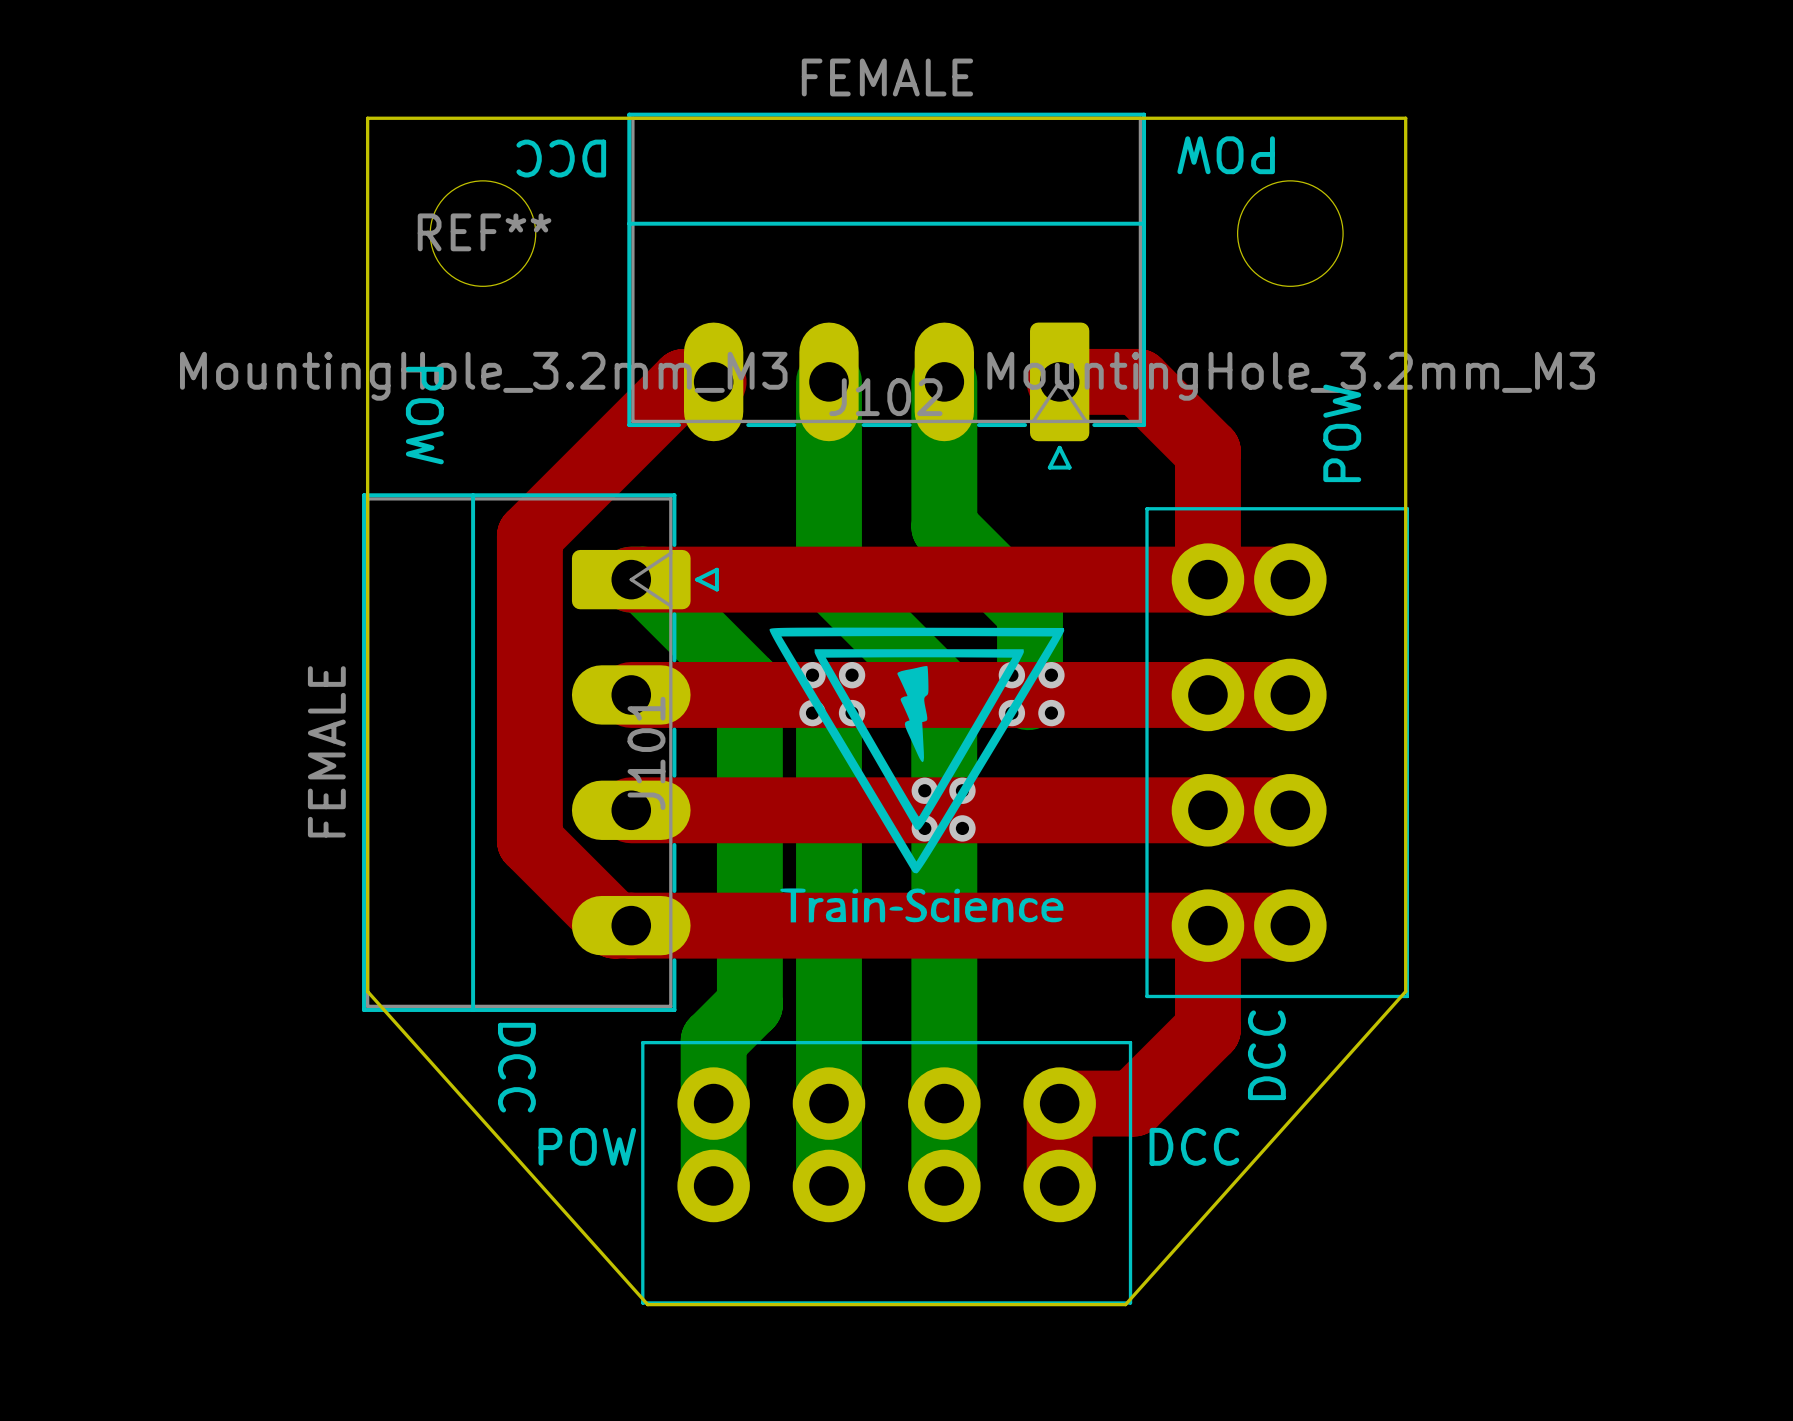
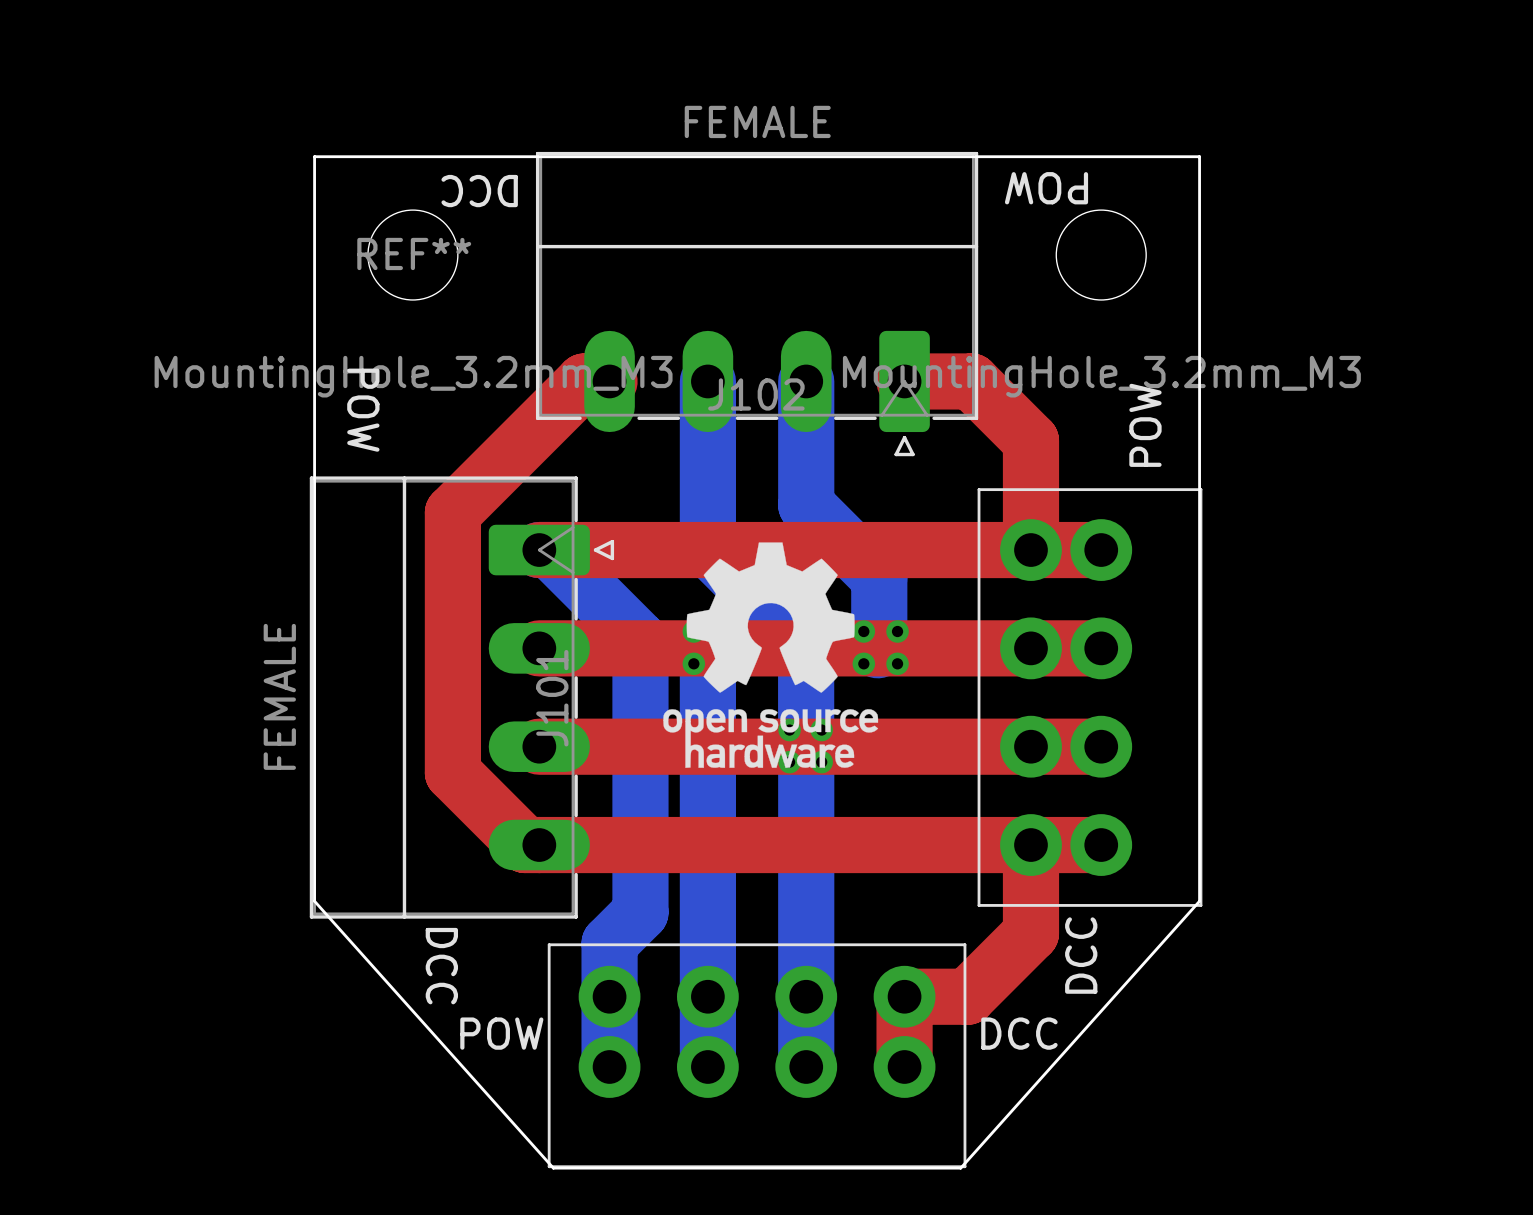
drawing: none -> [663, 542, 879, 768]
drawing: [769, 627, 1065, 923] -> none

